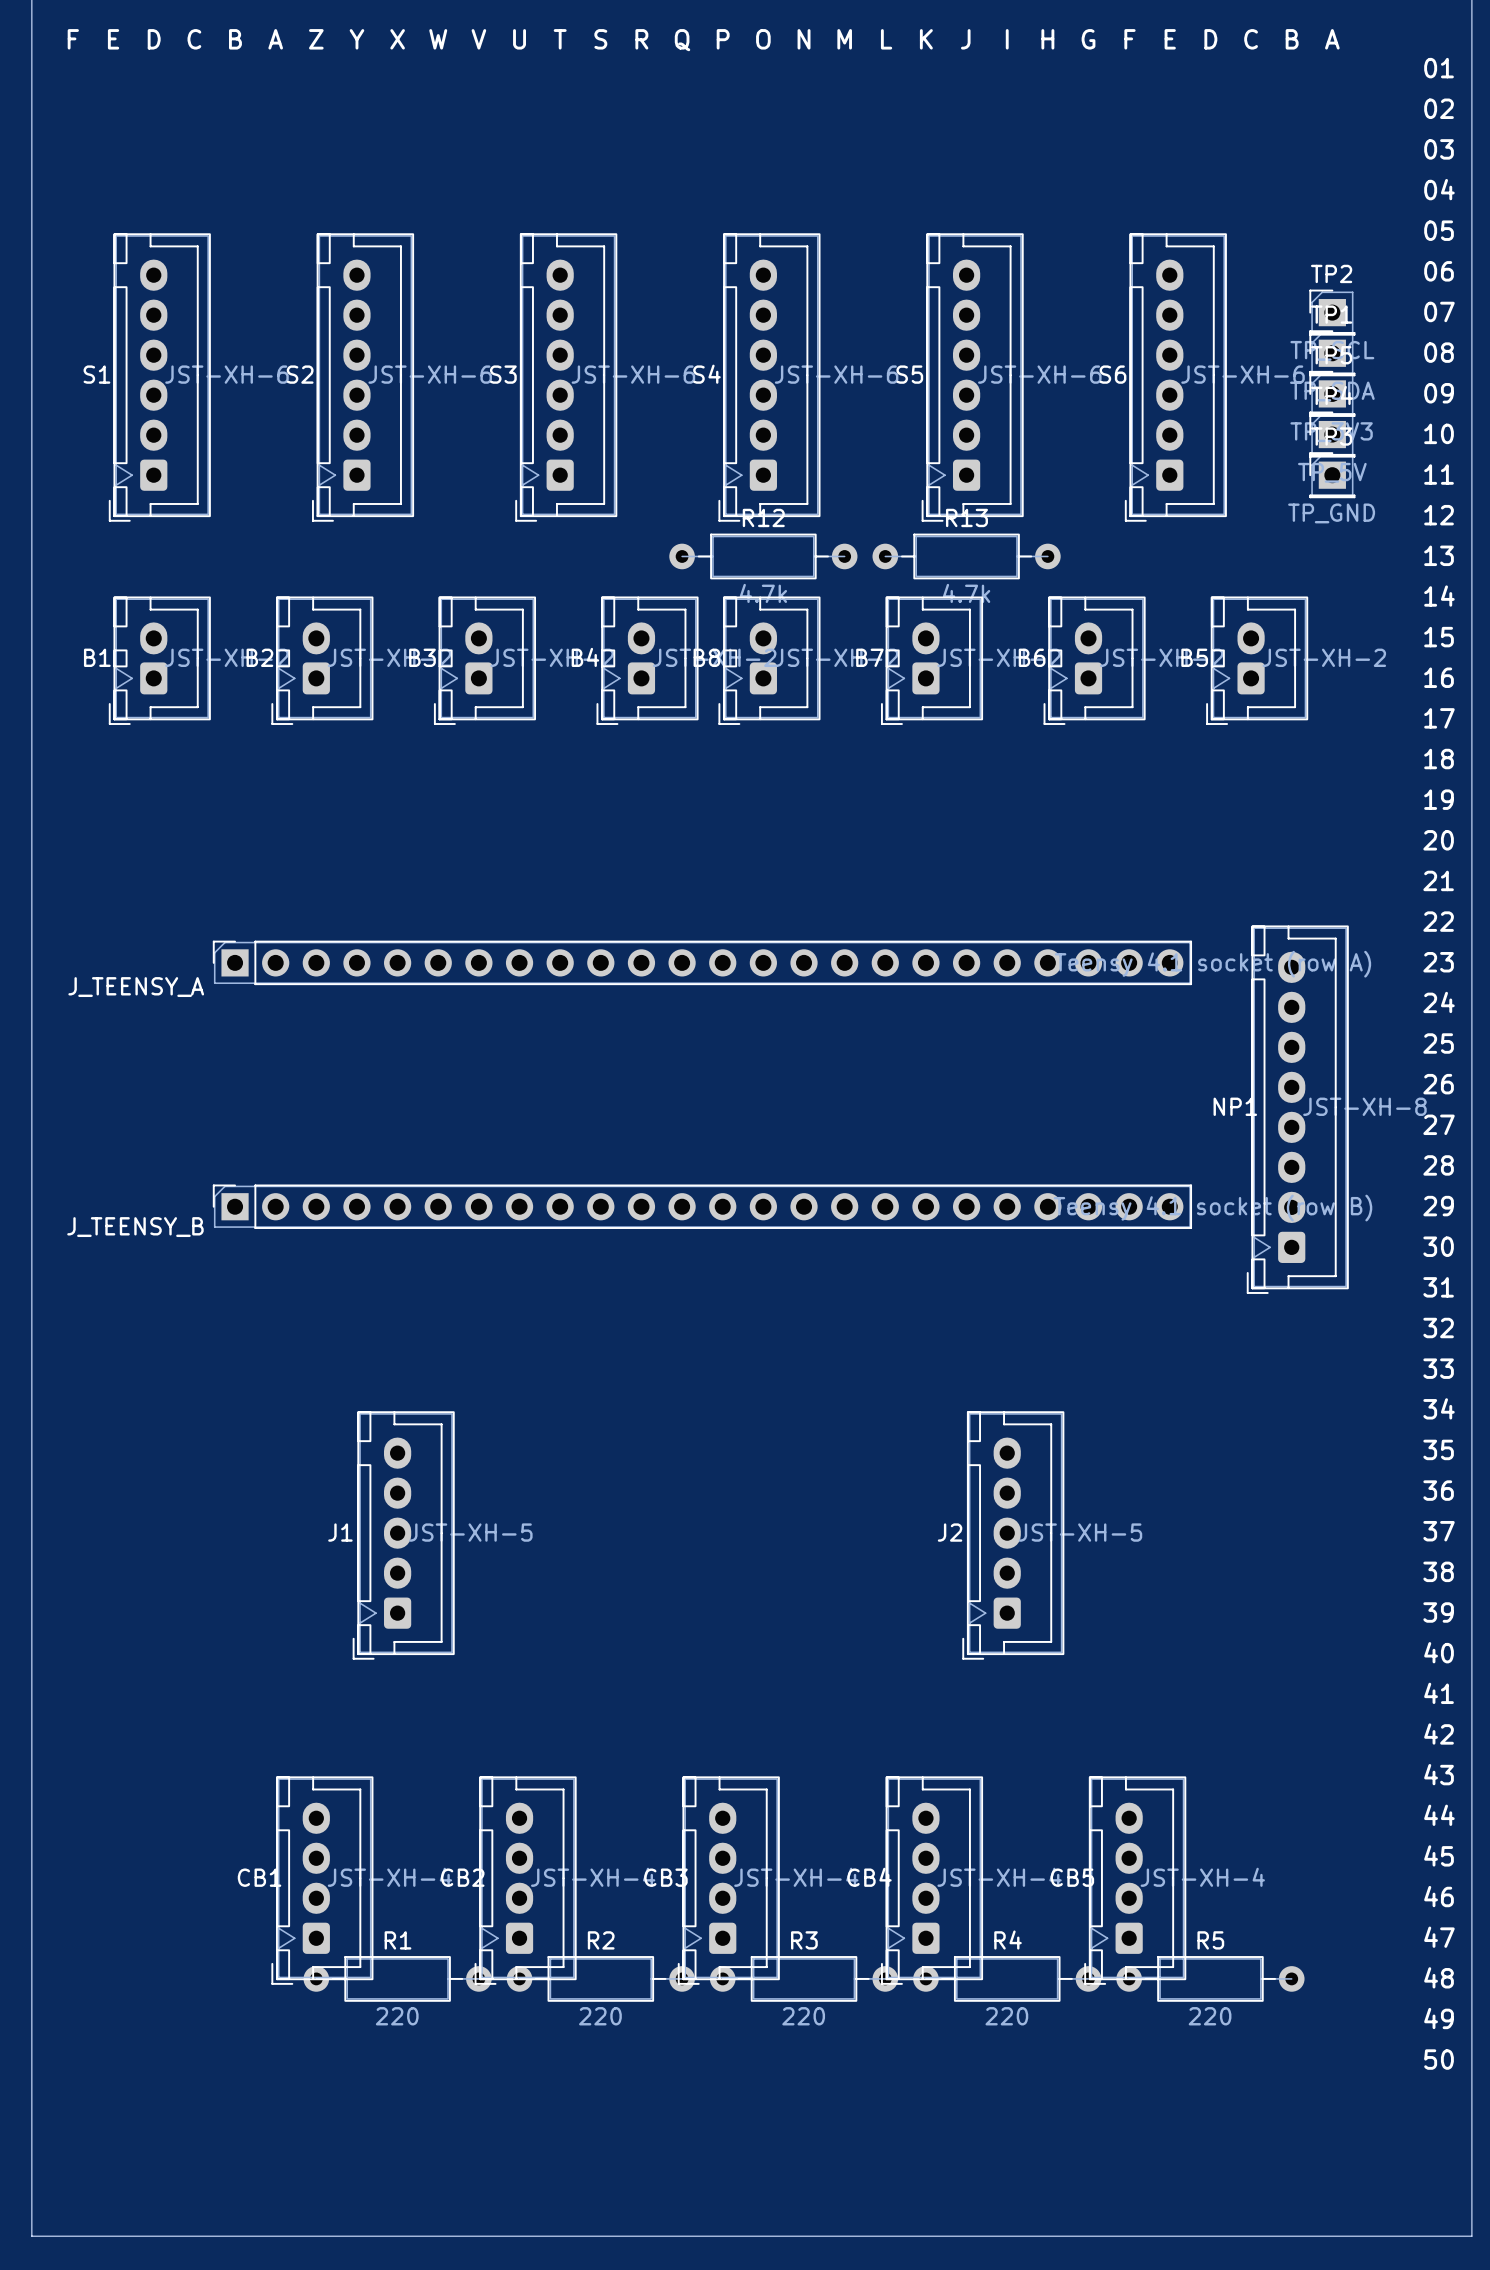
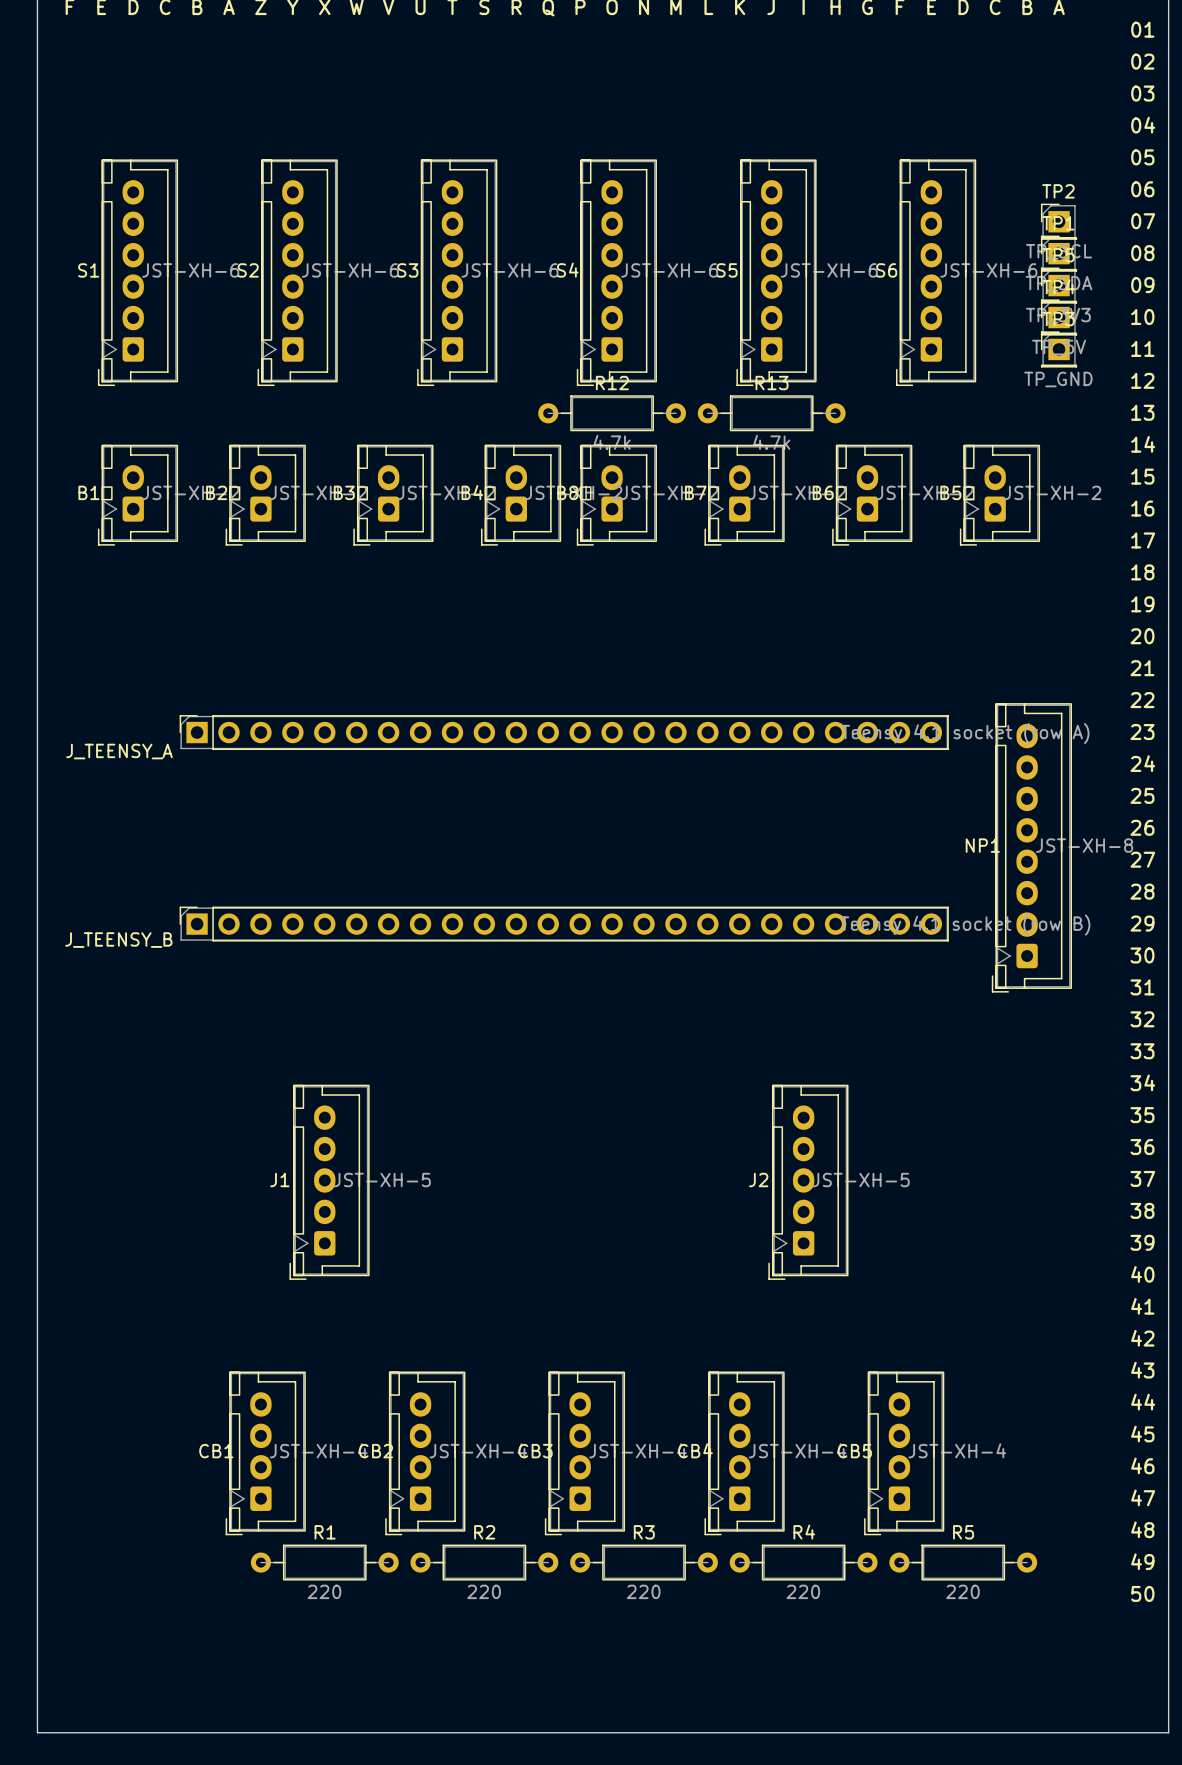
R1 position: (397, 1978) -> (324, 1562)
R2 position: (600, 1978) -> (484, 1562)
R3 position: (804, 1978) -> (644, 1562)
R4 position: (1007, 1978) -> (803, 1562)
R5 position: (1210, 1978) -> (963, 1562)

